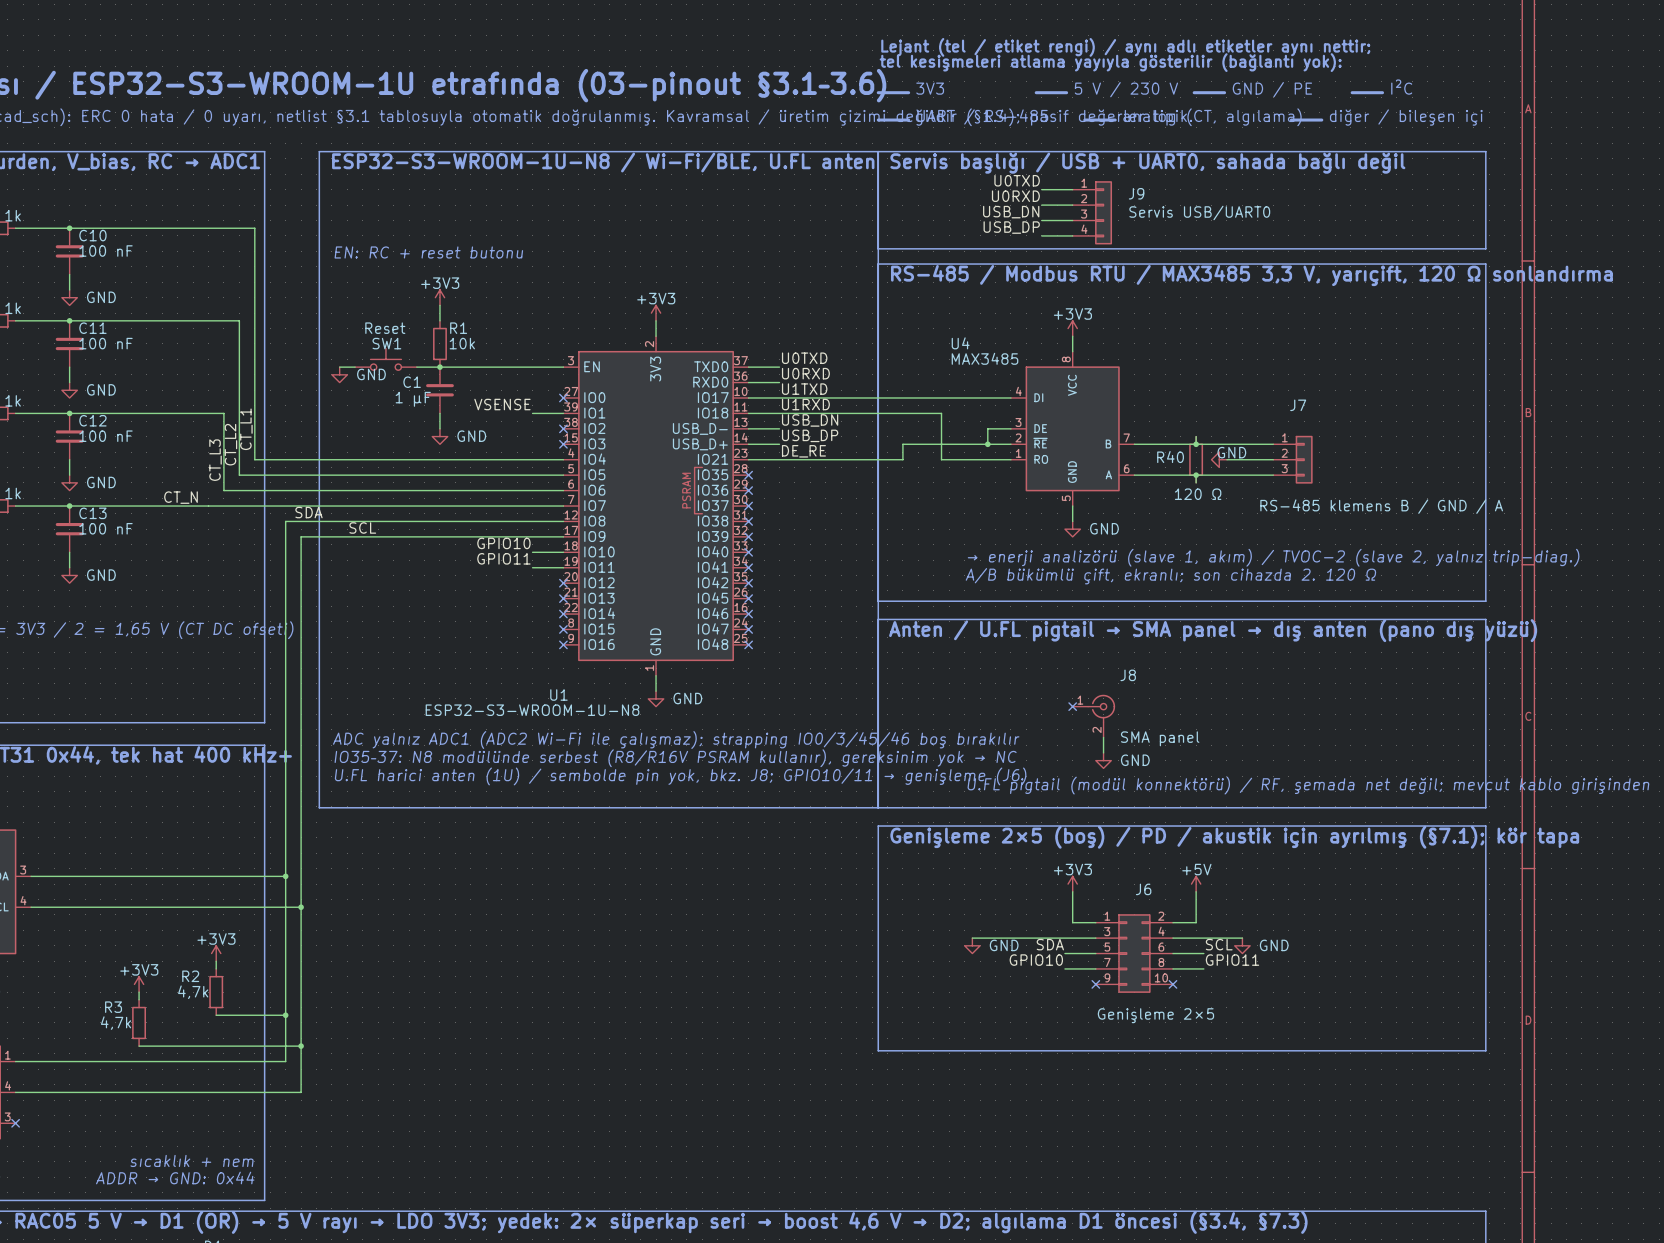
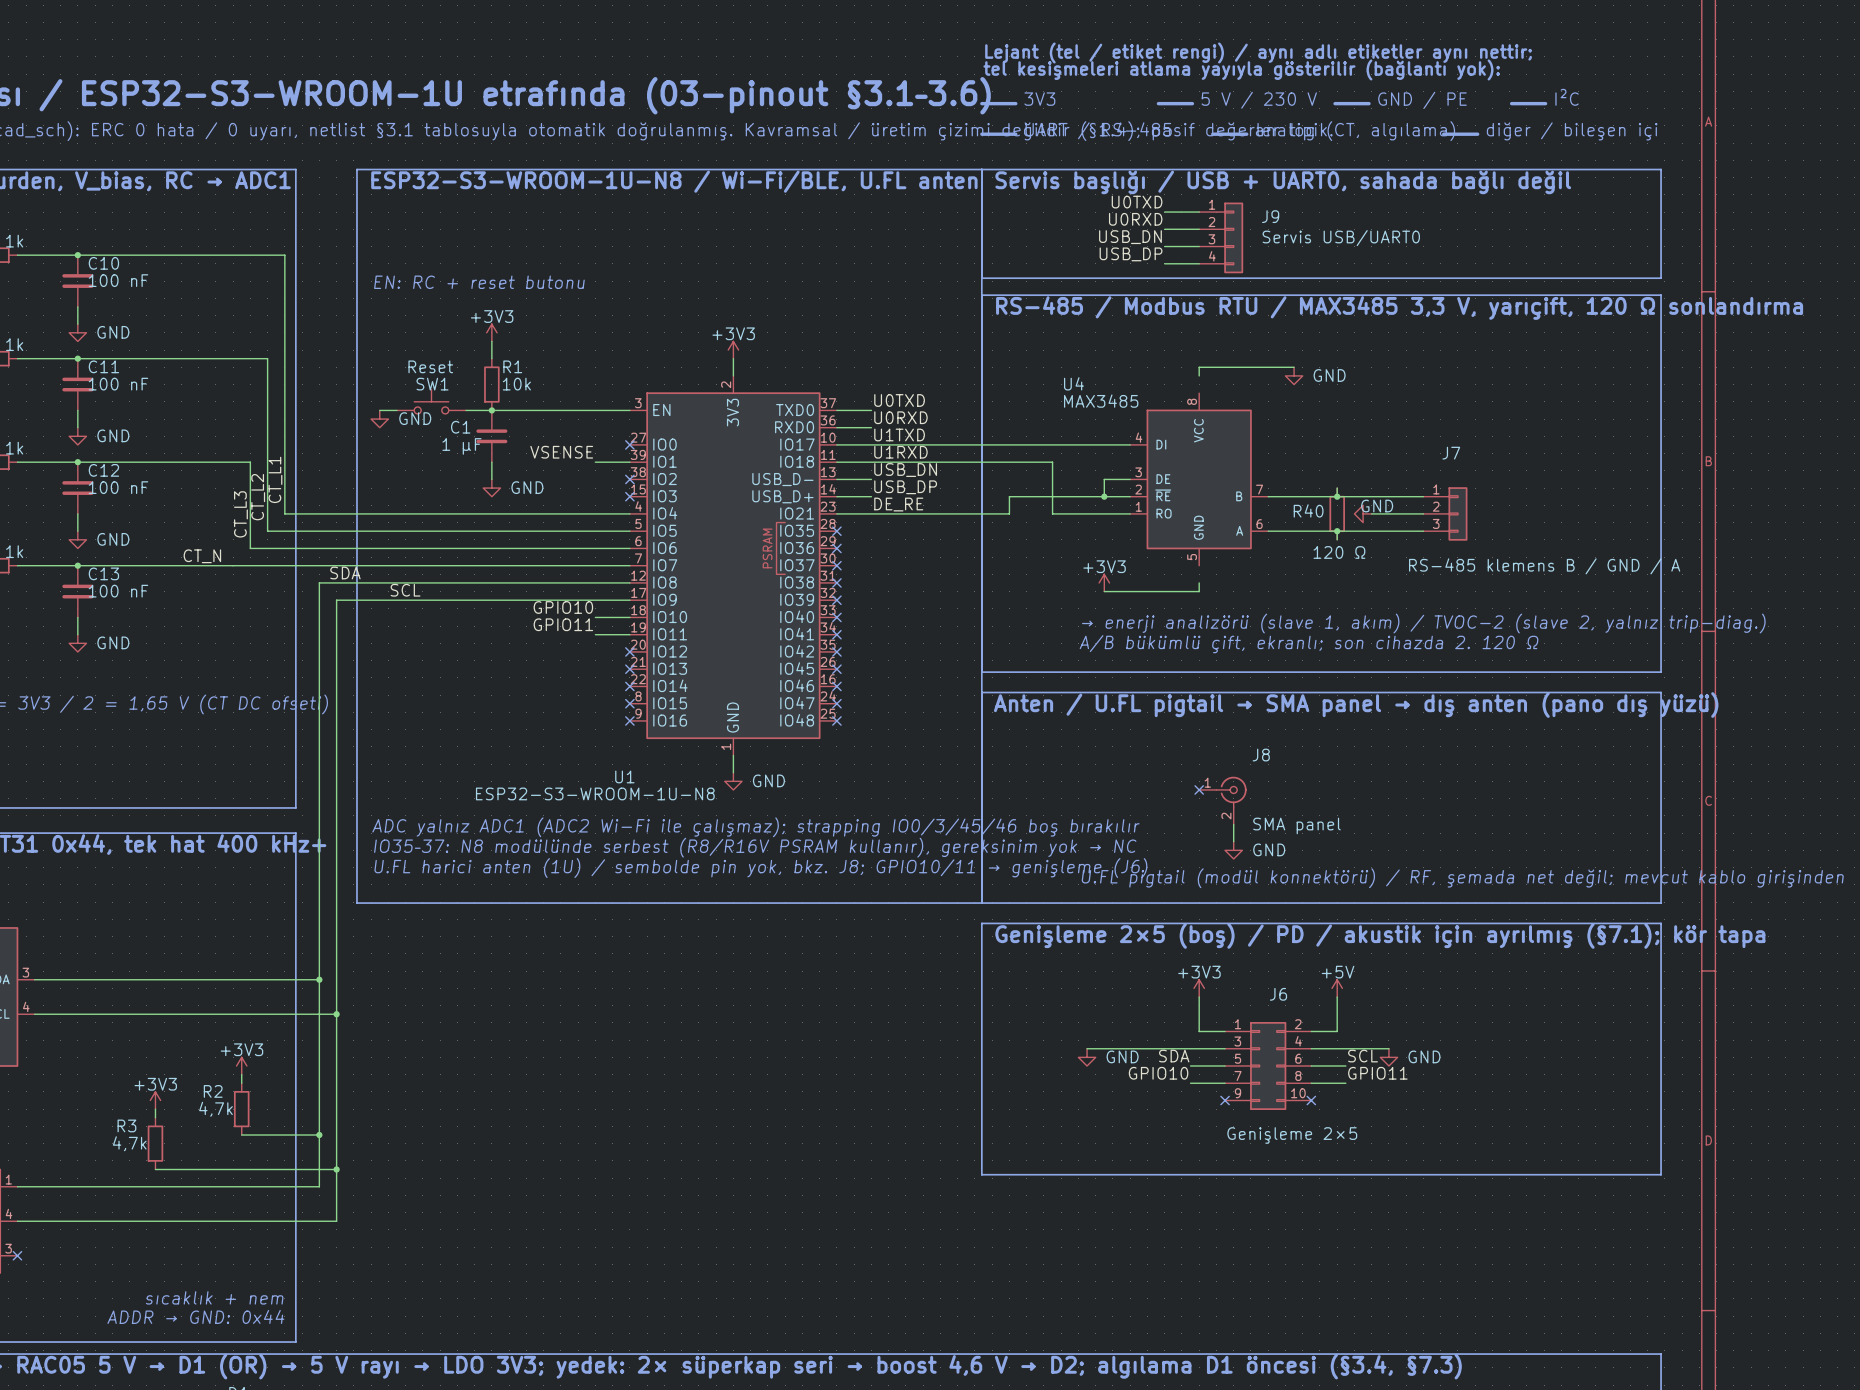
power symbol: +3V3 (1072, 328) -> none
wire: (1072, 336) (1072, 351) -> (1199, 375) (1199, 367) (1294, 367)
power symbol: none -> GND (1294, 375)
wire: (1072, 506) (1072, 521) -> (1104, 591) (1199, 591) (1199, 582)
power symbol: none -> +3V3 (1104, 582)
power symbol: GND (1072, 529) -> none

